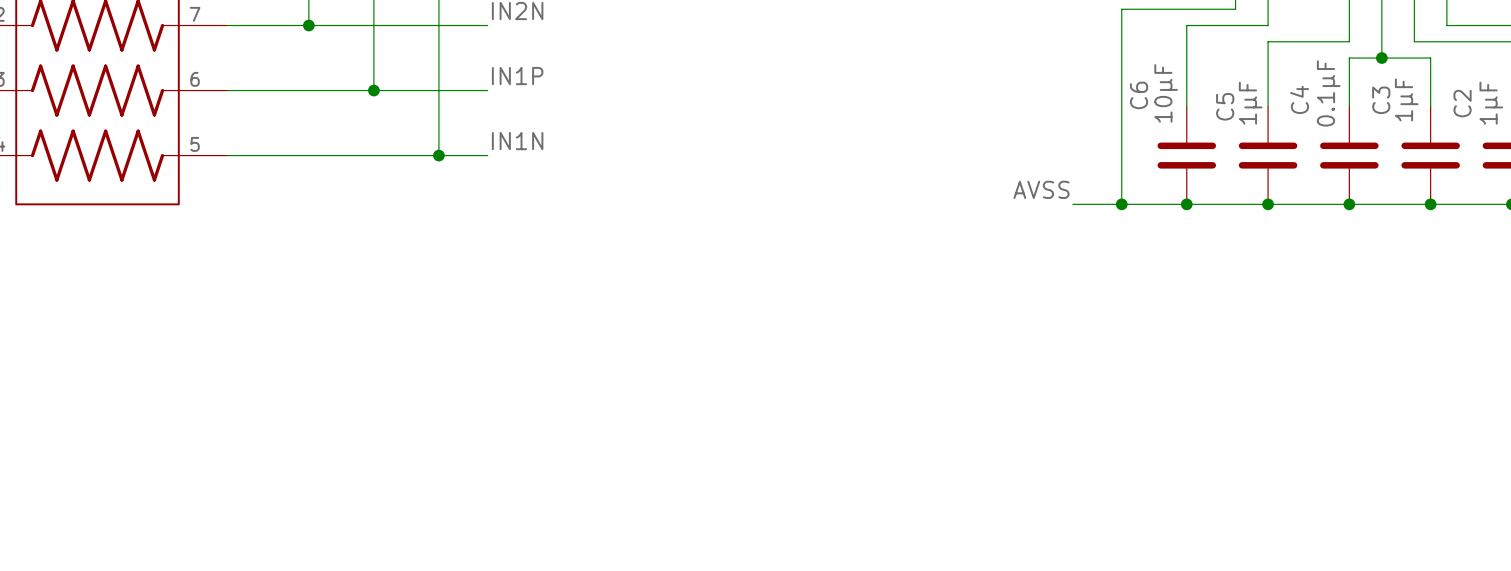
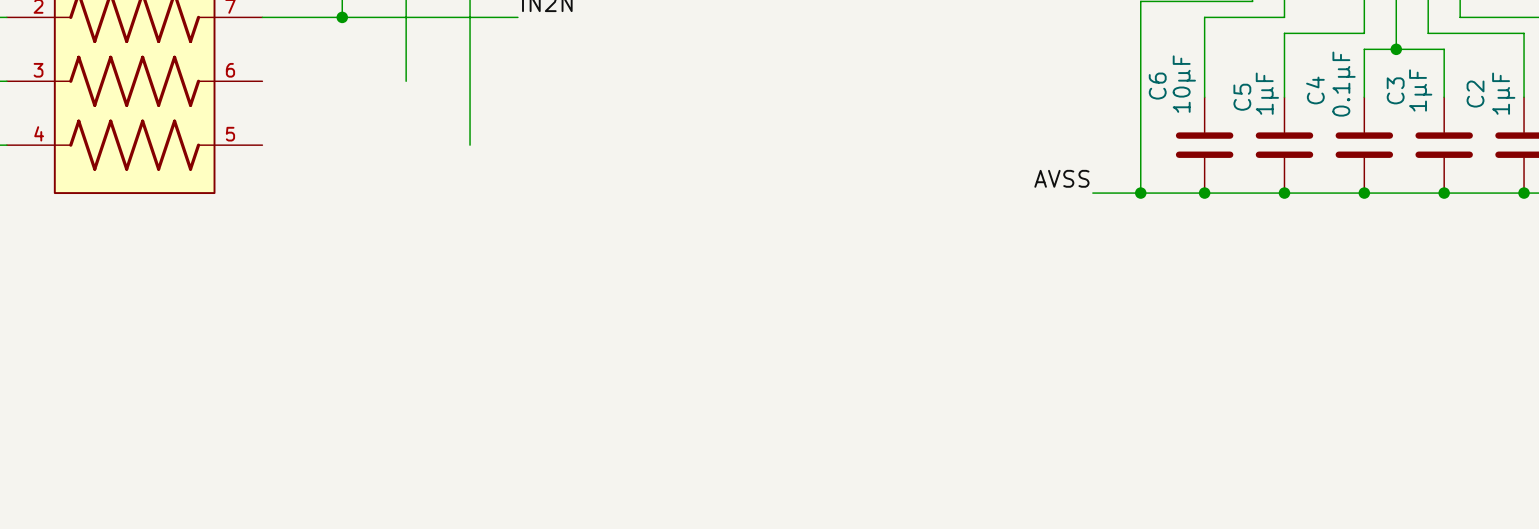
label: IN1P (517, 76) -> none
wire: (227, 90) (487, 90) -> none
junction: (373, 90) -> none
label: IN1N (517, 141) -> none
wire: (227, 155) (487, 155) -> none
junction: (438, 155) -> none

